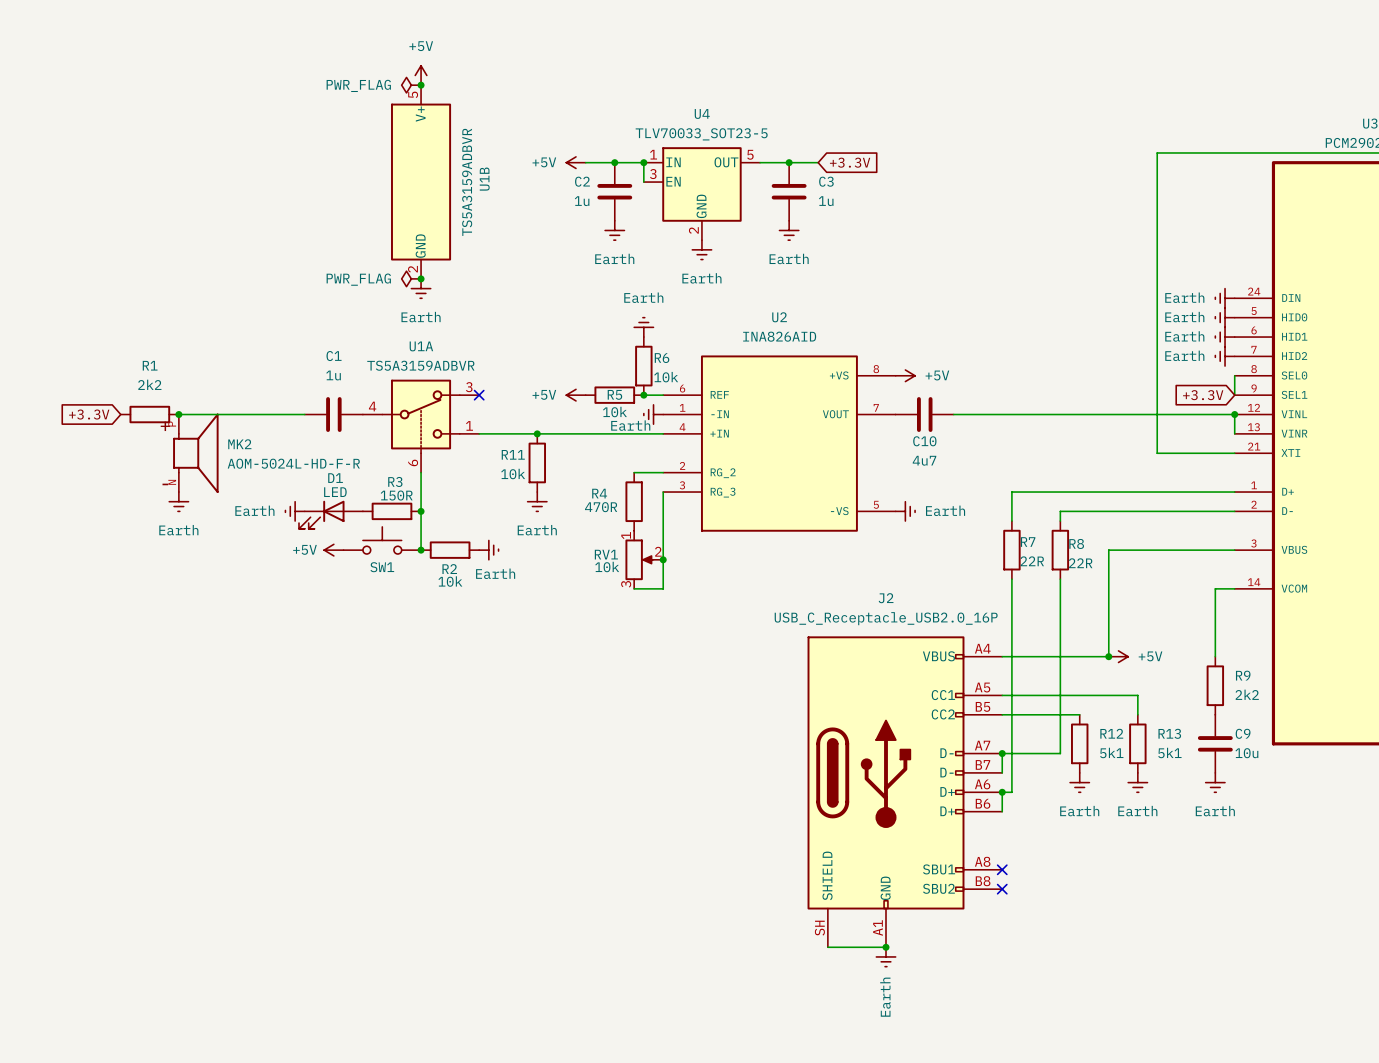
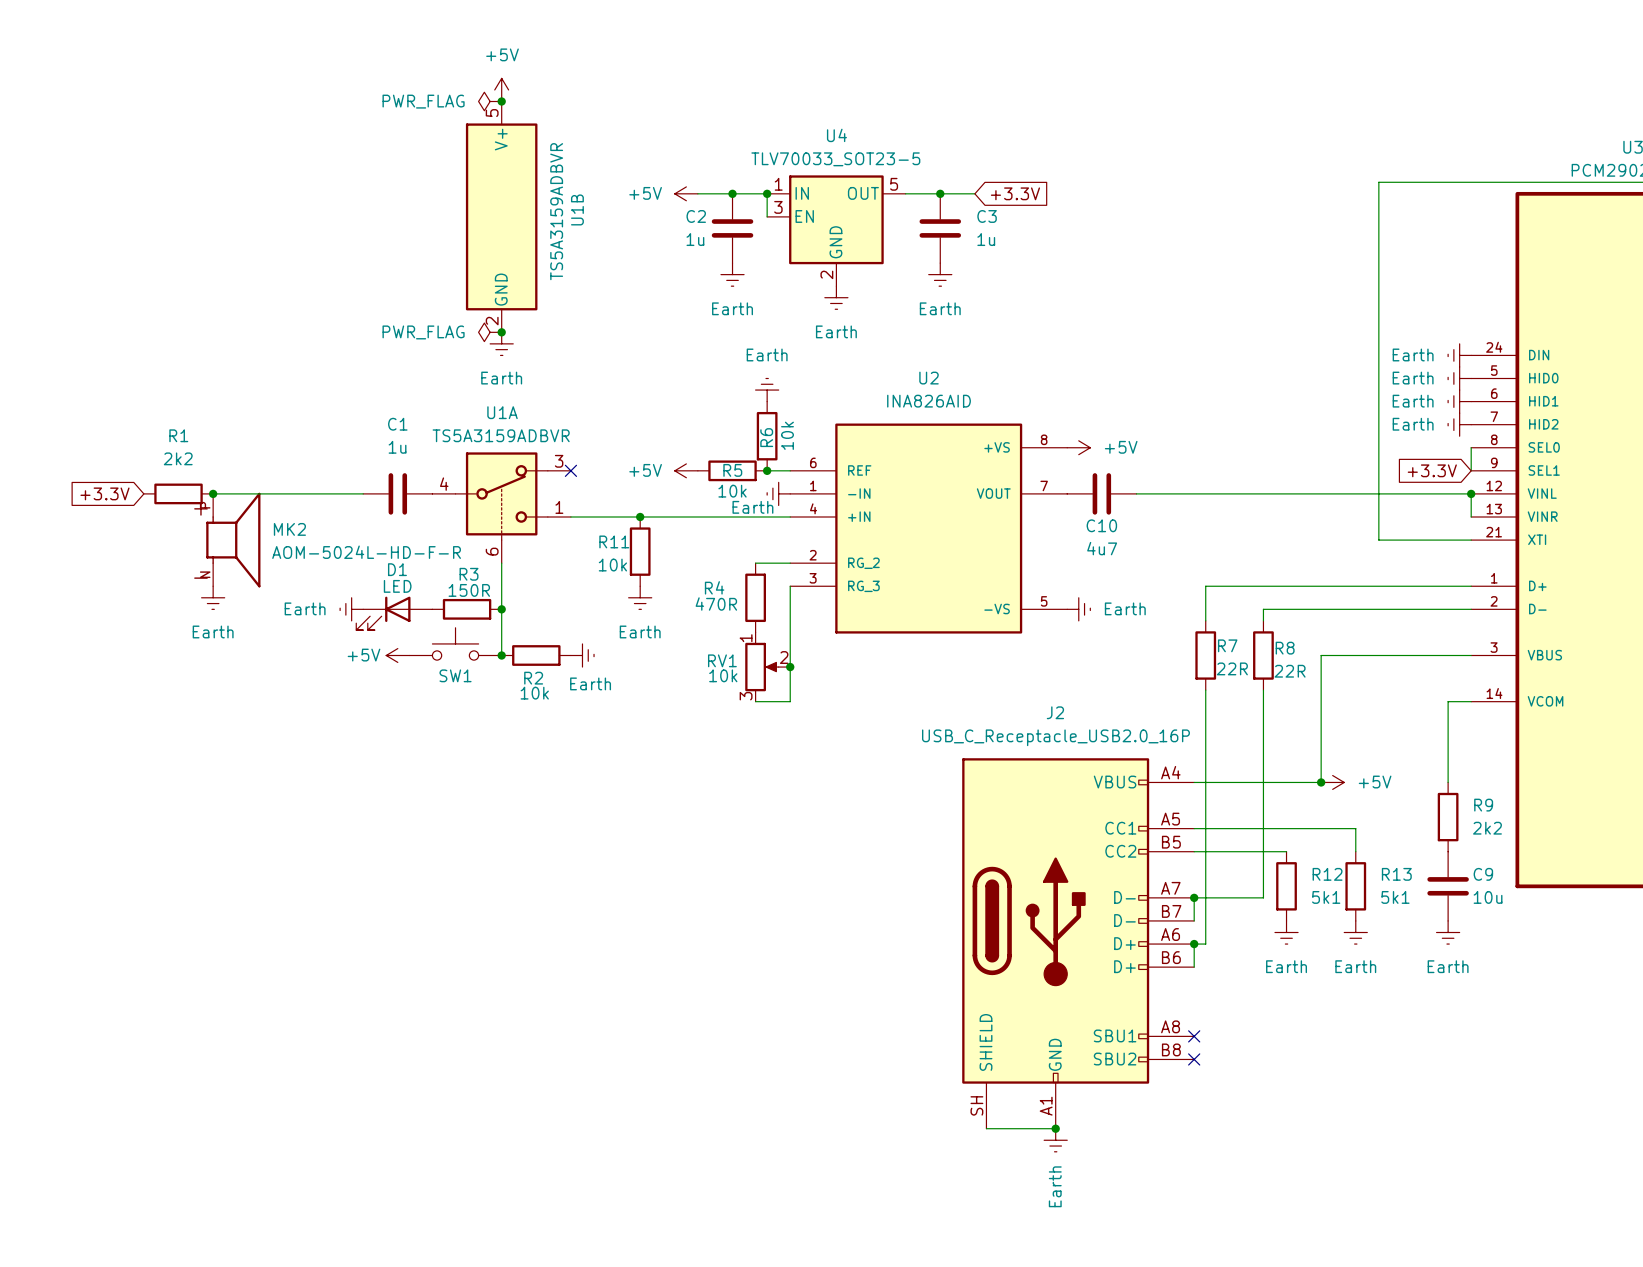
R6 name rotation: 0° (662, 358) -> 90° counterclockwise (766, 437)
R6 value rotation: 0° (666, 377) -> 90° counterclockwise (787, 435)

